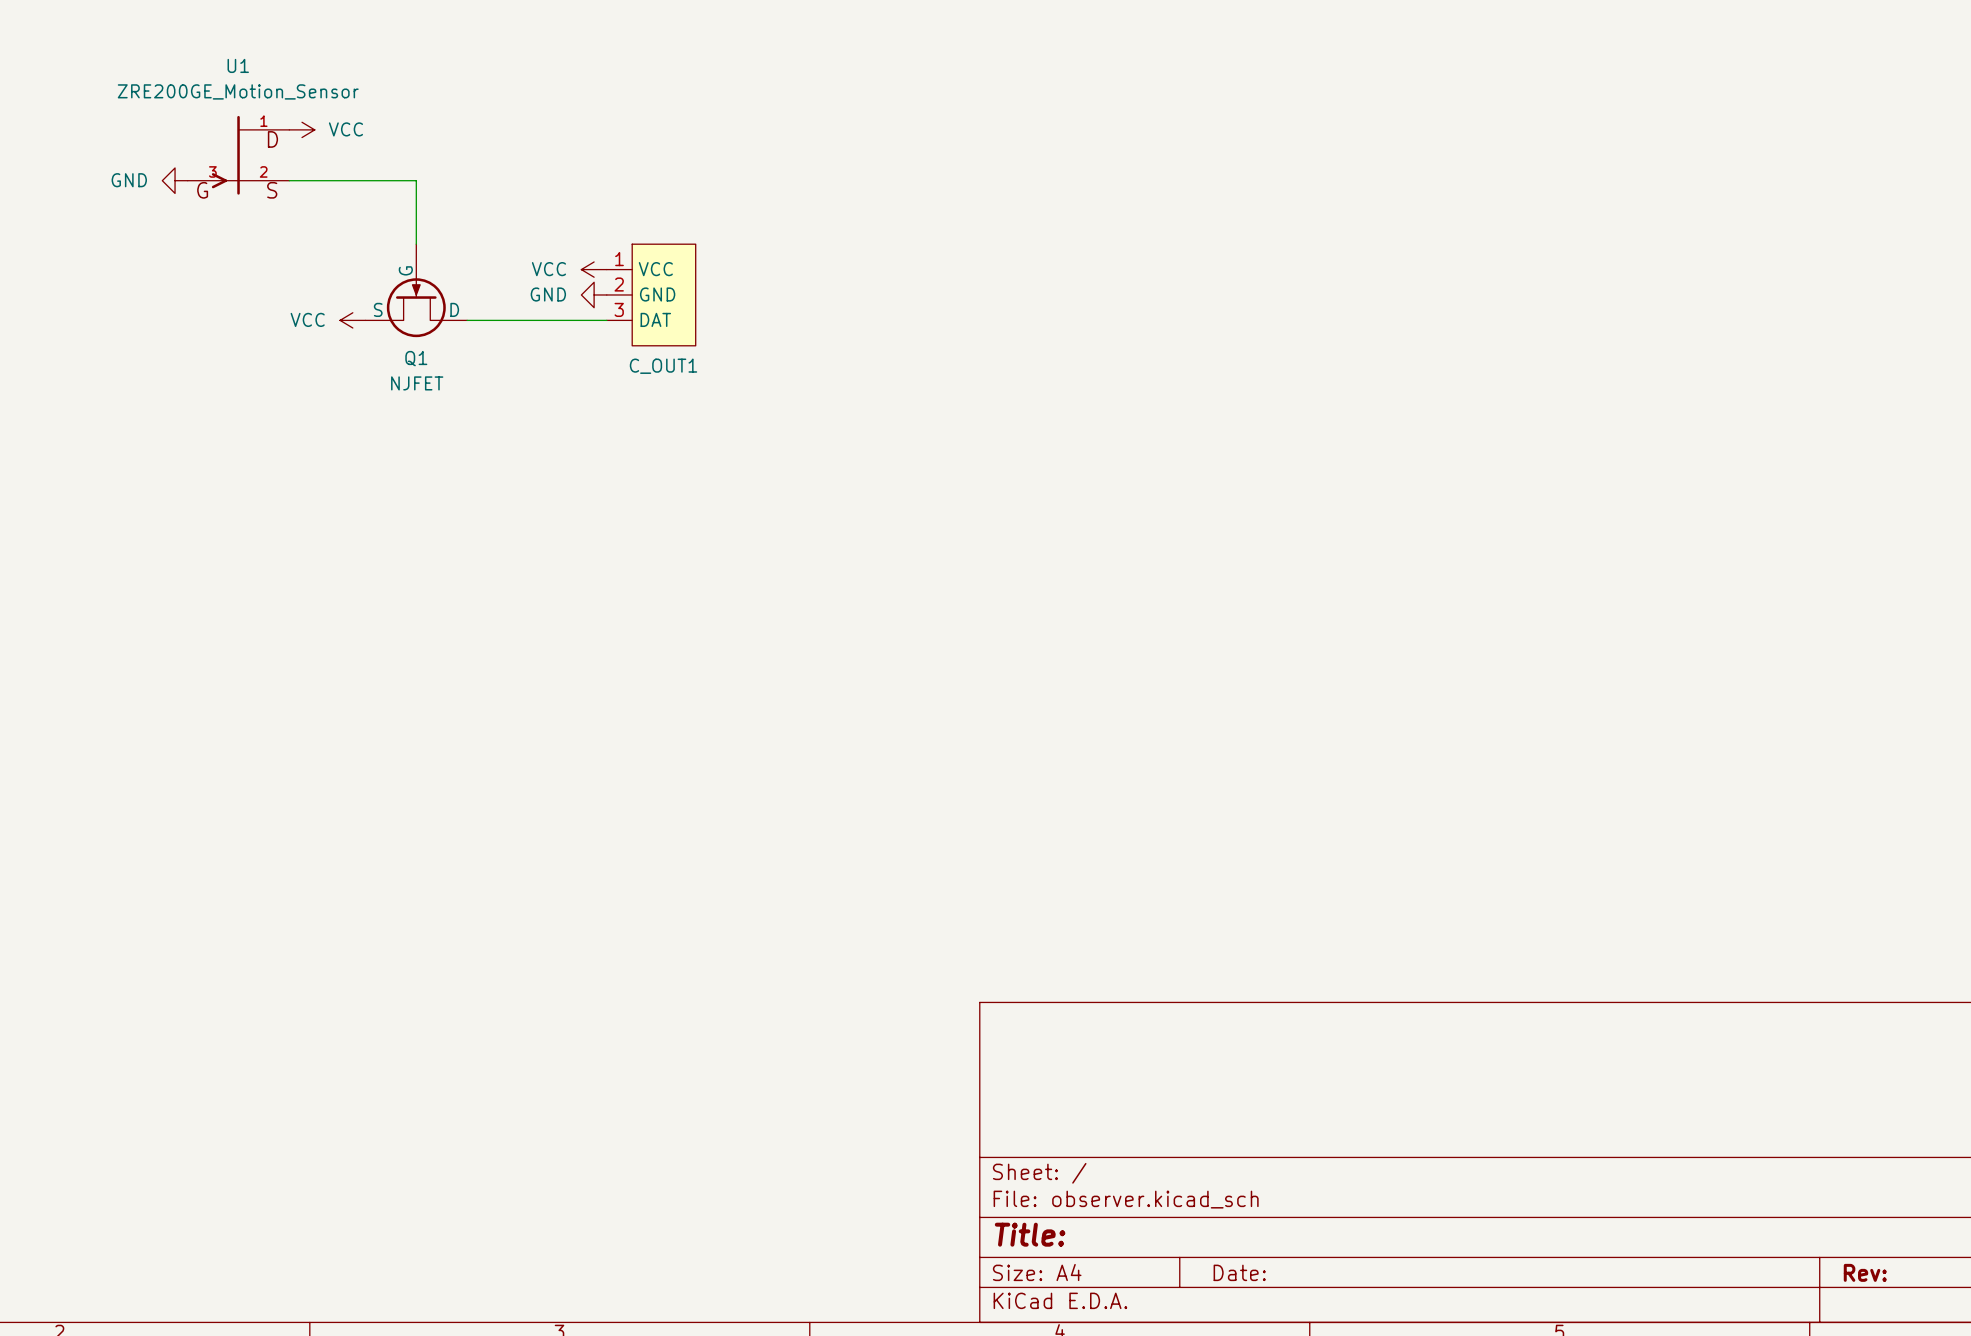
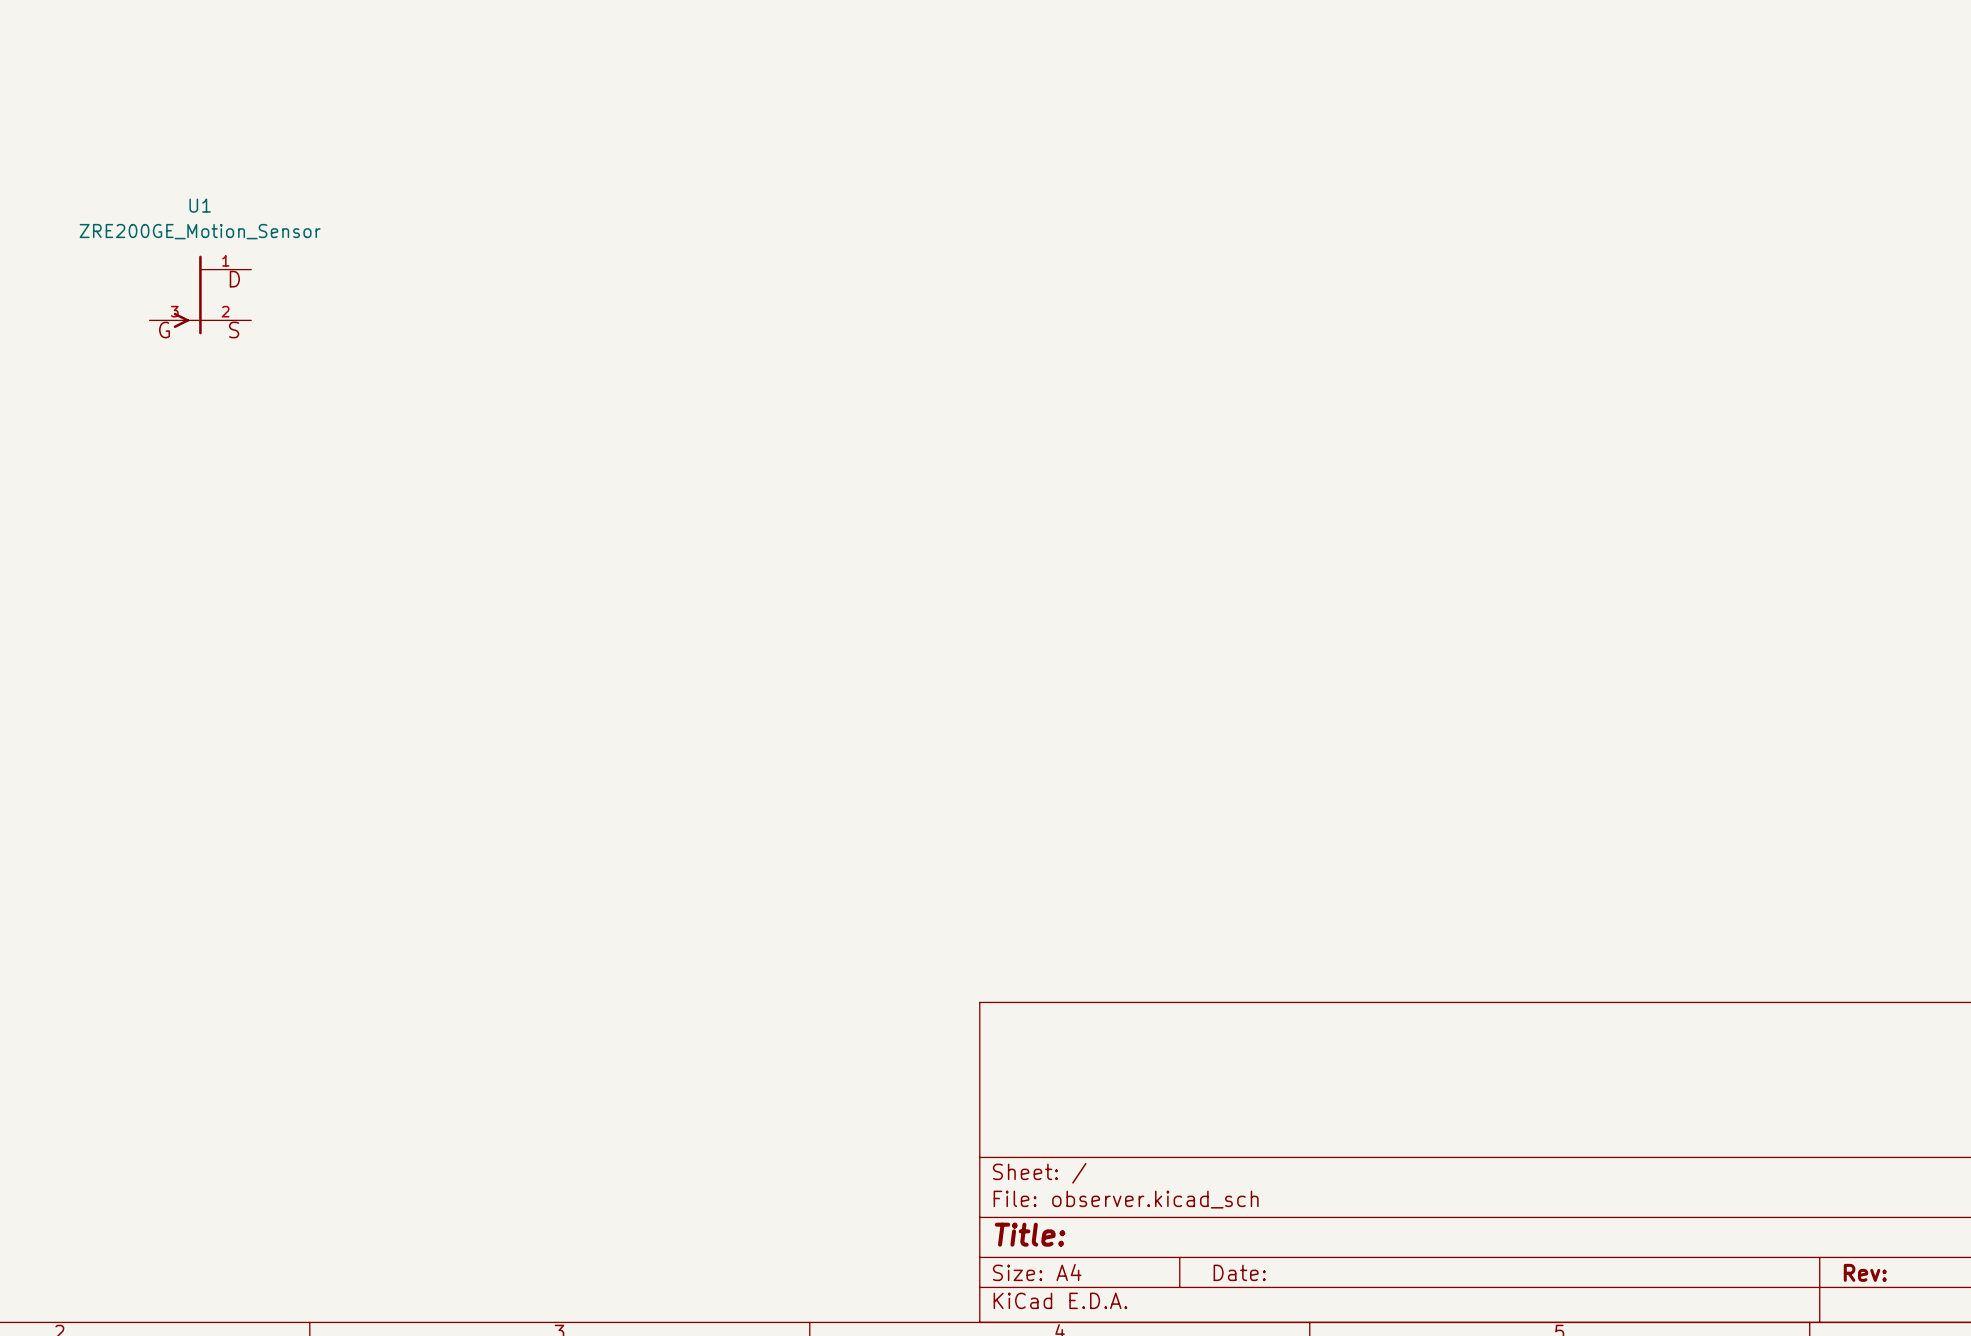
power symbol: VCC (302, 129) -> none
U1 position: (238, 155) -> (200, 294)
power symbol: GND (175, 180) -> none
wire: (289, 180) (416, 180) (416, 244) -> none
power symbol: VCC (594, 269) -> none
Q1: NJFET (416, 290) -> none
power symbol: GND (594, 294) -> none
C_OUT1: (651, 294) -> none
power symbol: VCC (352, 320) -> none
wire: (467, 320) (606, 320) -> none

